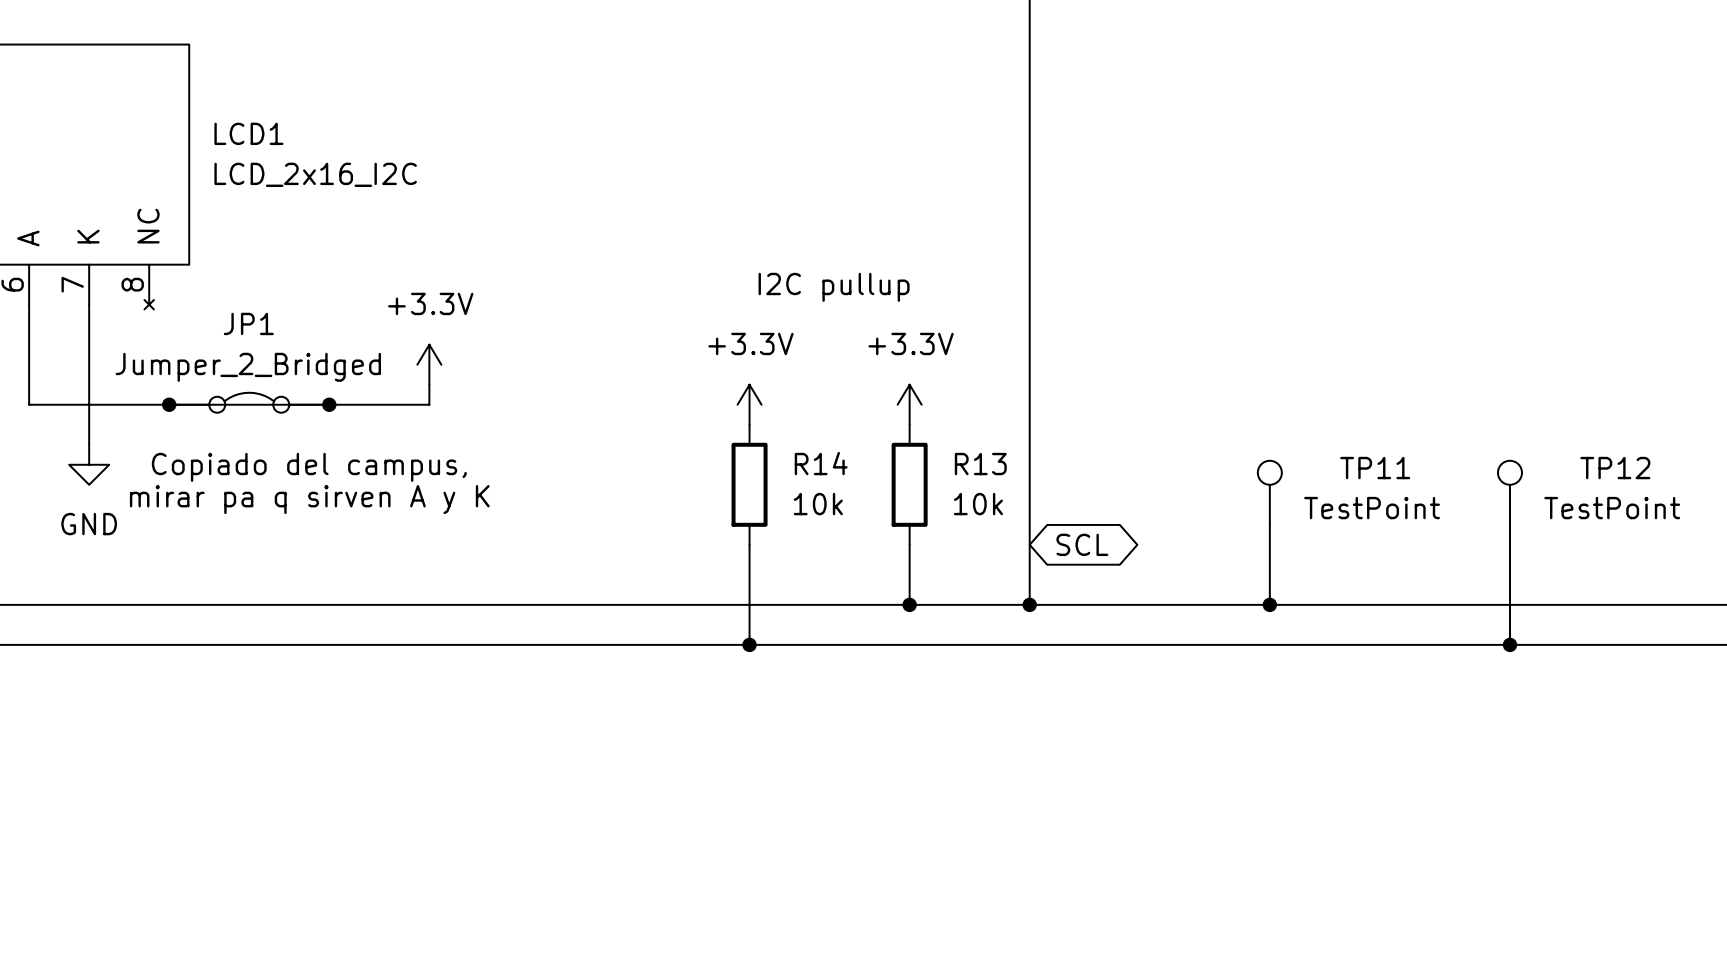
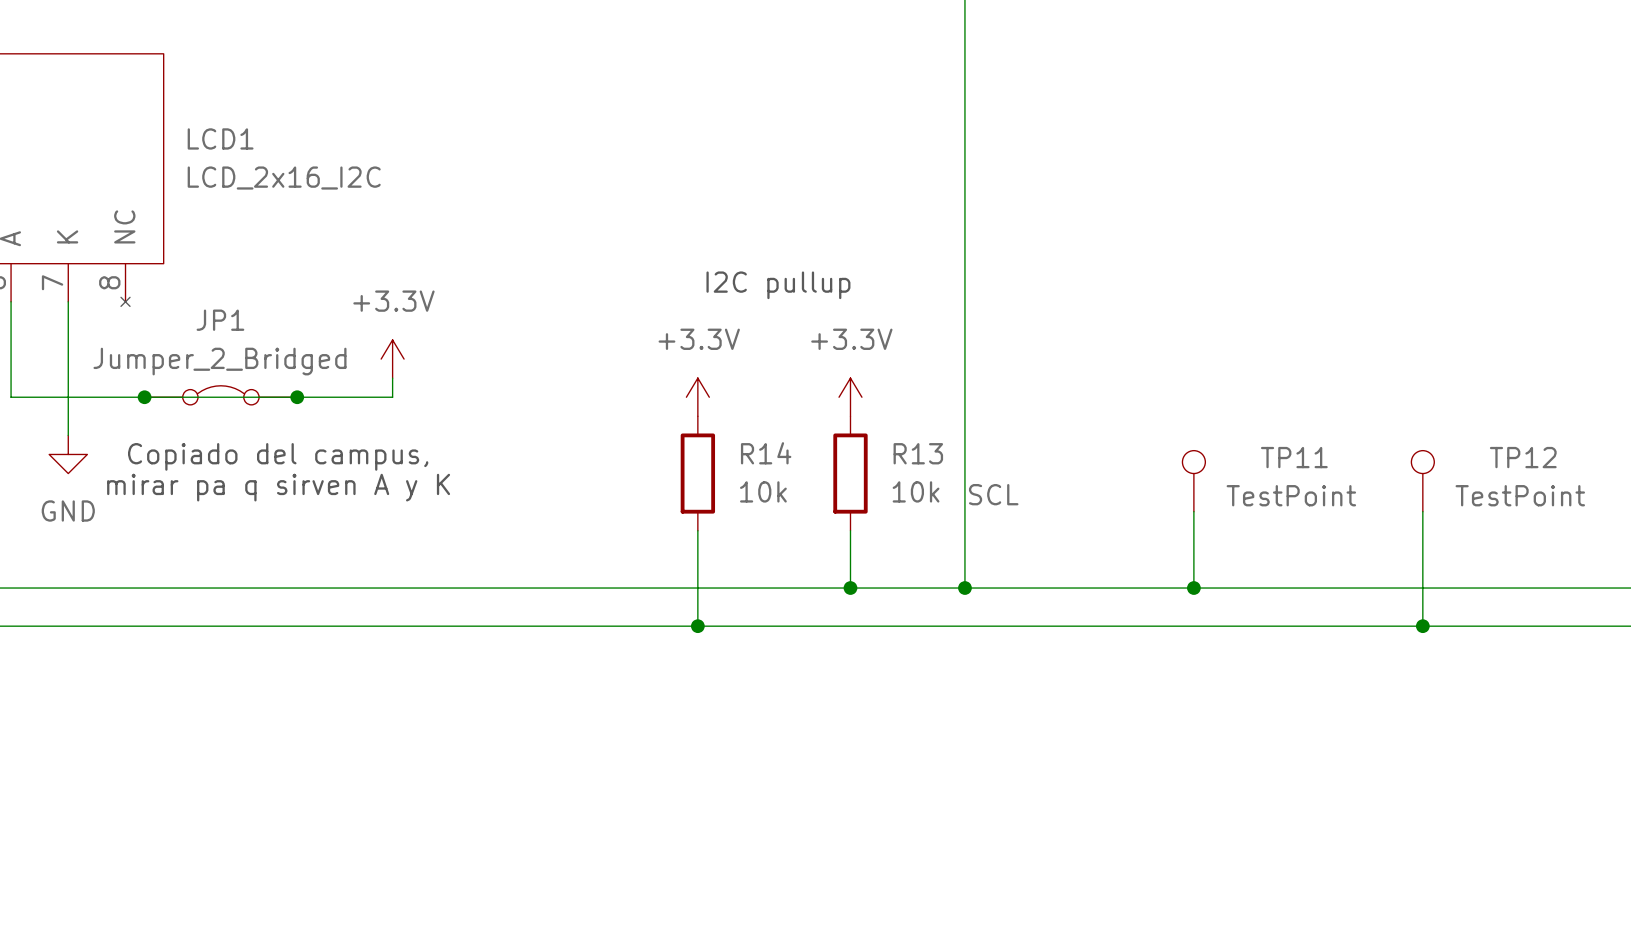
label: none -> SCL (993, 494)
global label: SCL (1082, 544) -> none

